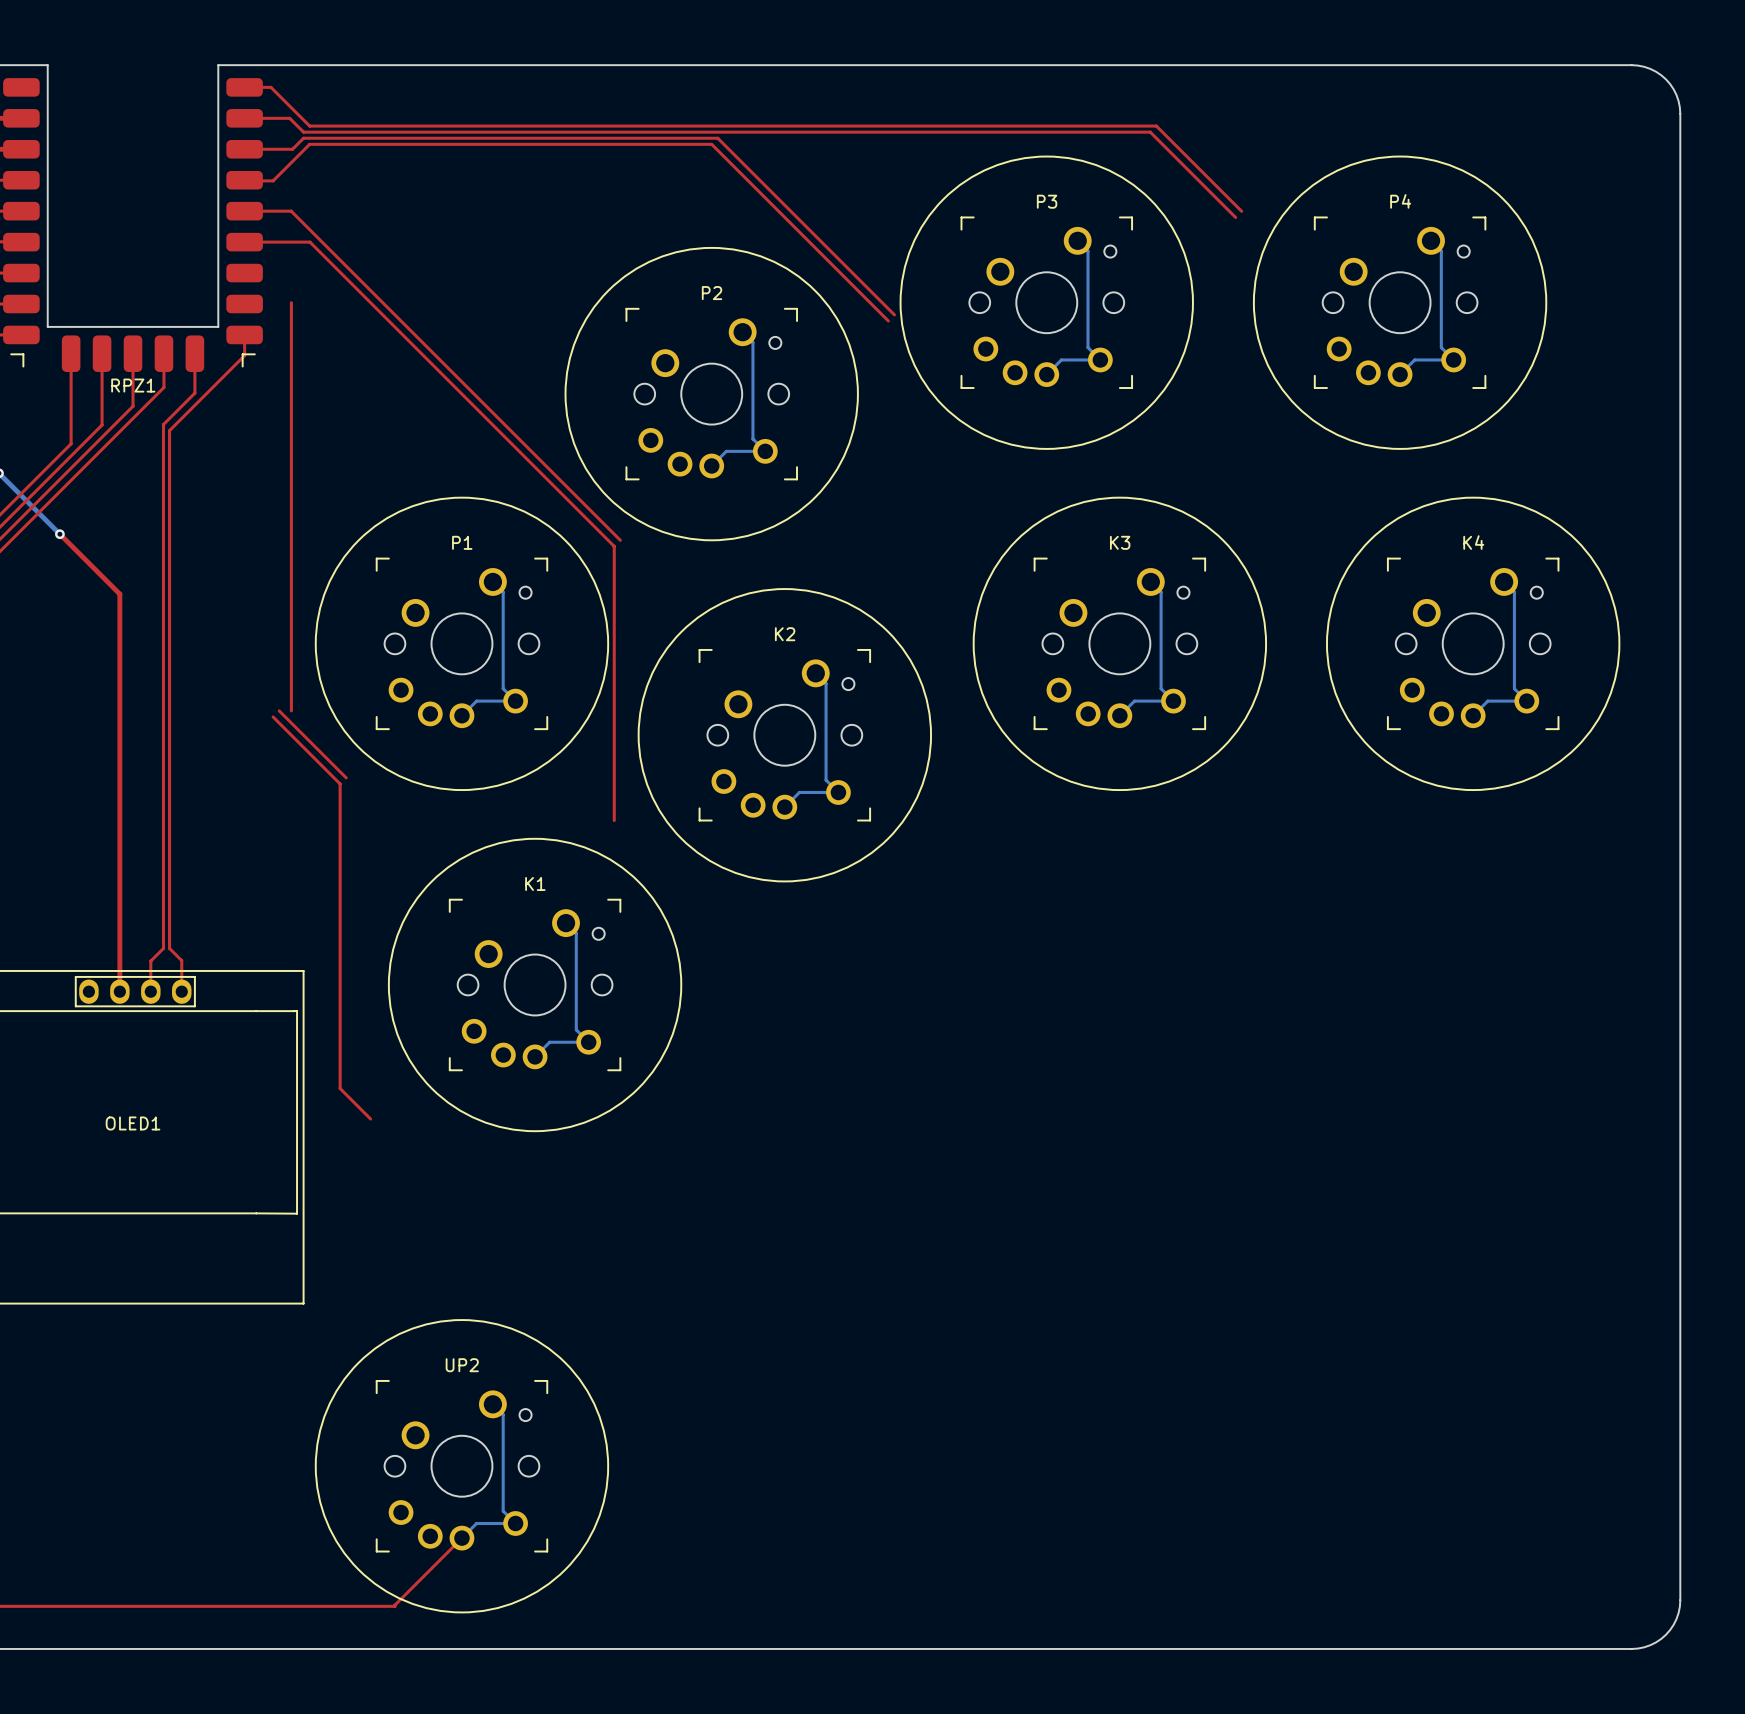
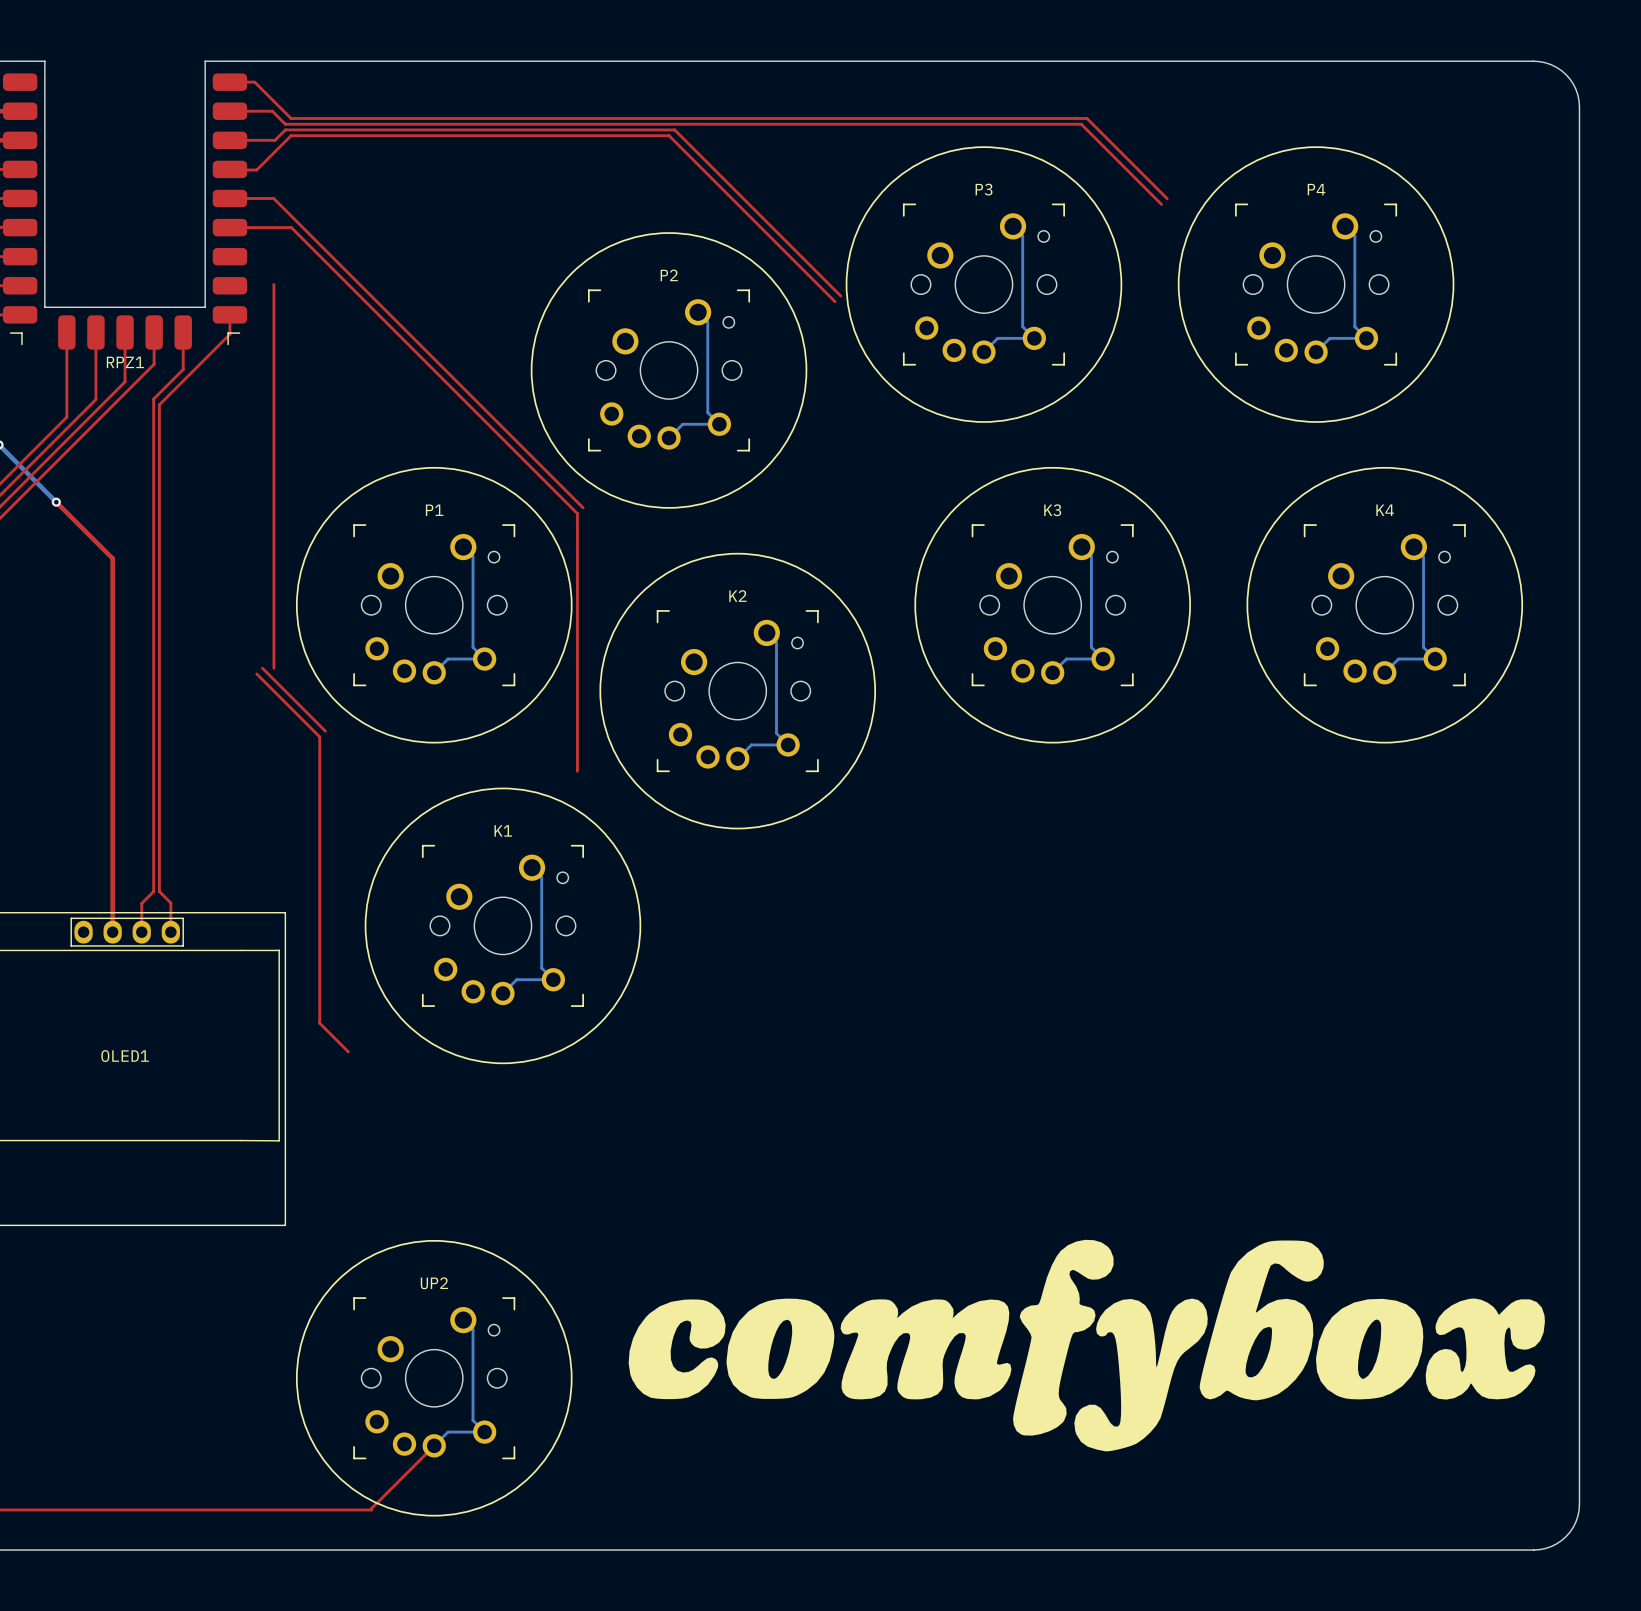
drawing: none -> [628, 1239, 1545, 1452]

